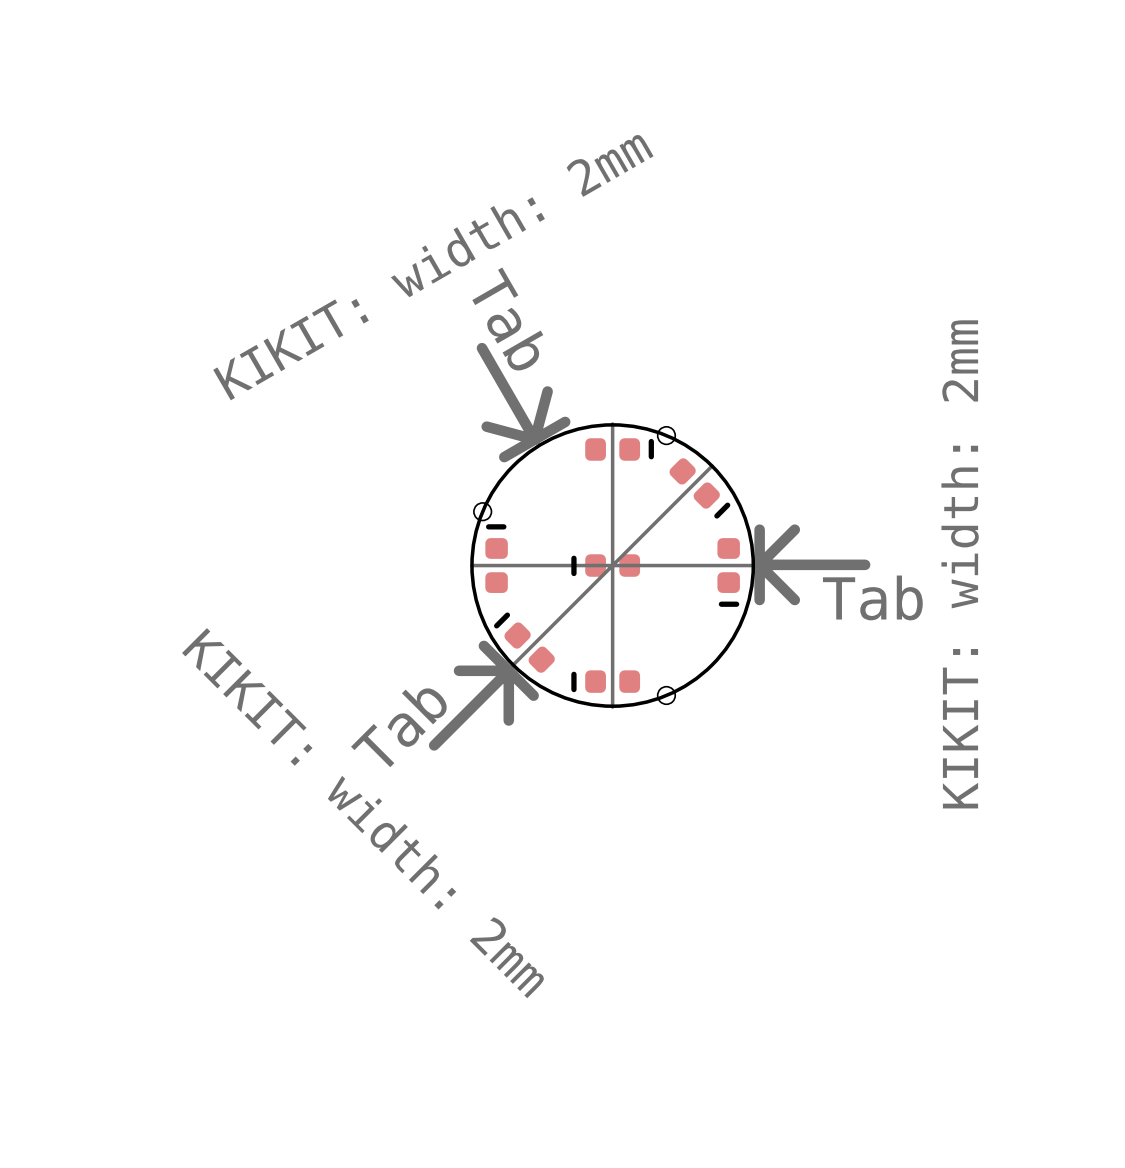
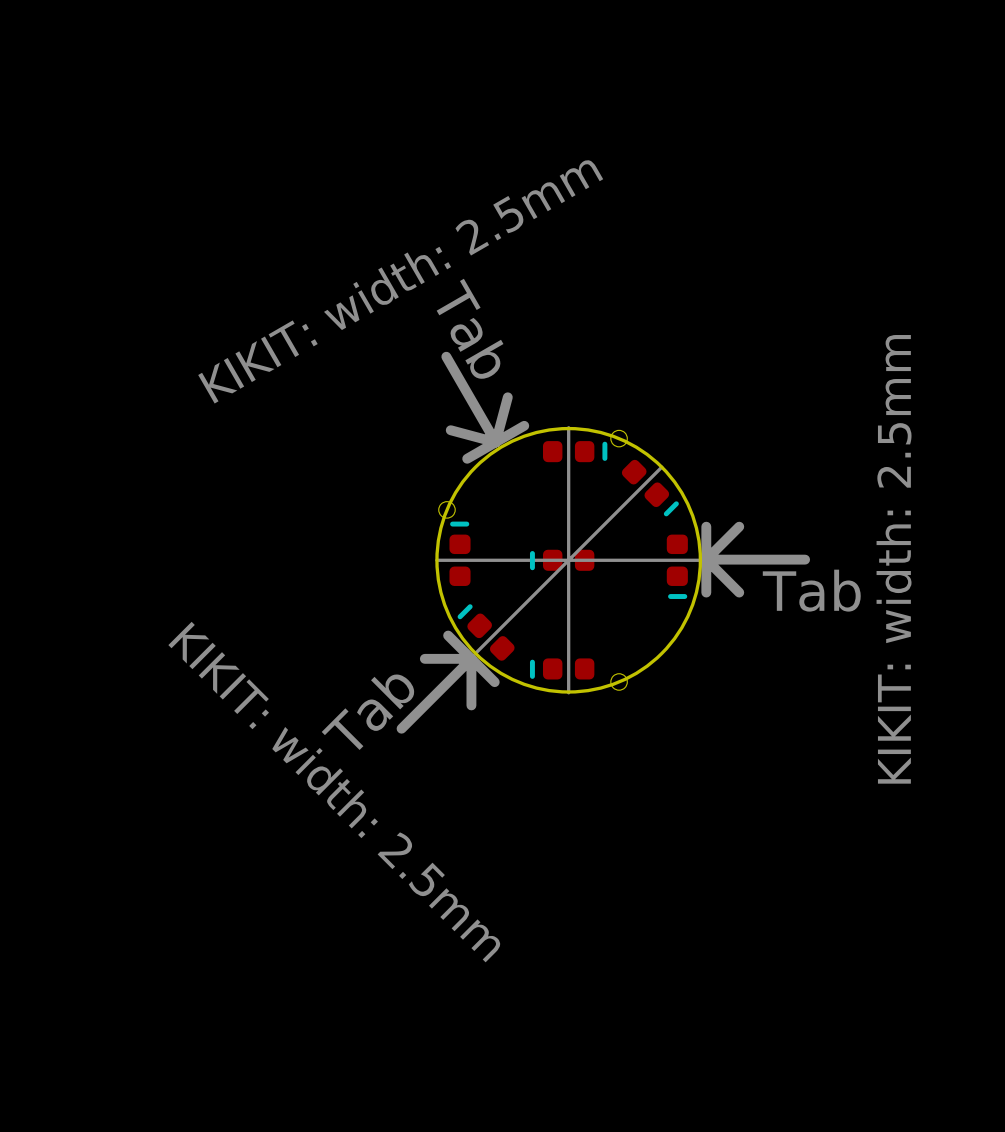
drawing shape: [213, 134, 654, 463] -> [198, 159, 604, 464]
drawing shape: [754, 320, 979, 809] -> [701, 335, 912, 784]
drawing shape: [182, 628, 545, 999] -> [168, 621, 501, 963]

